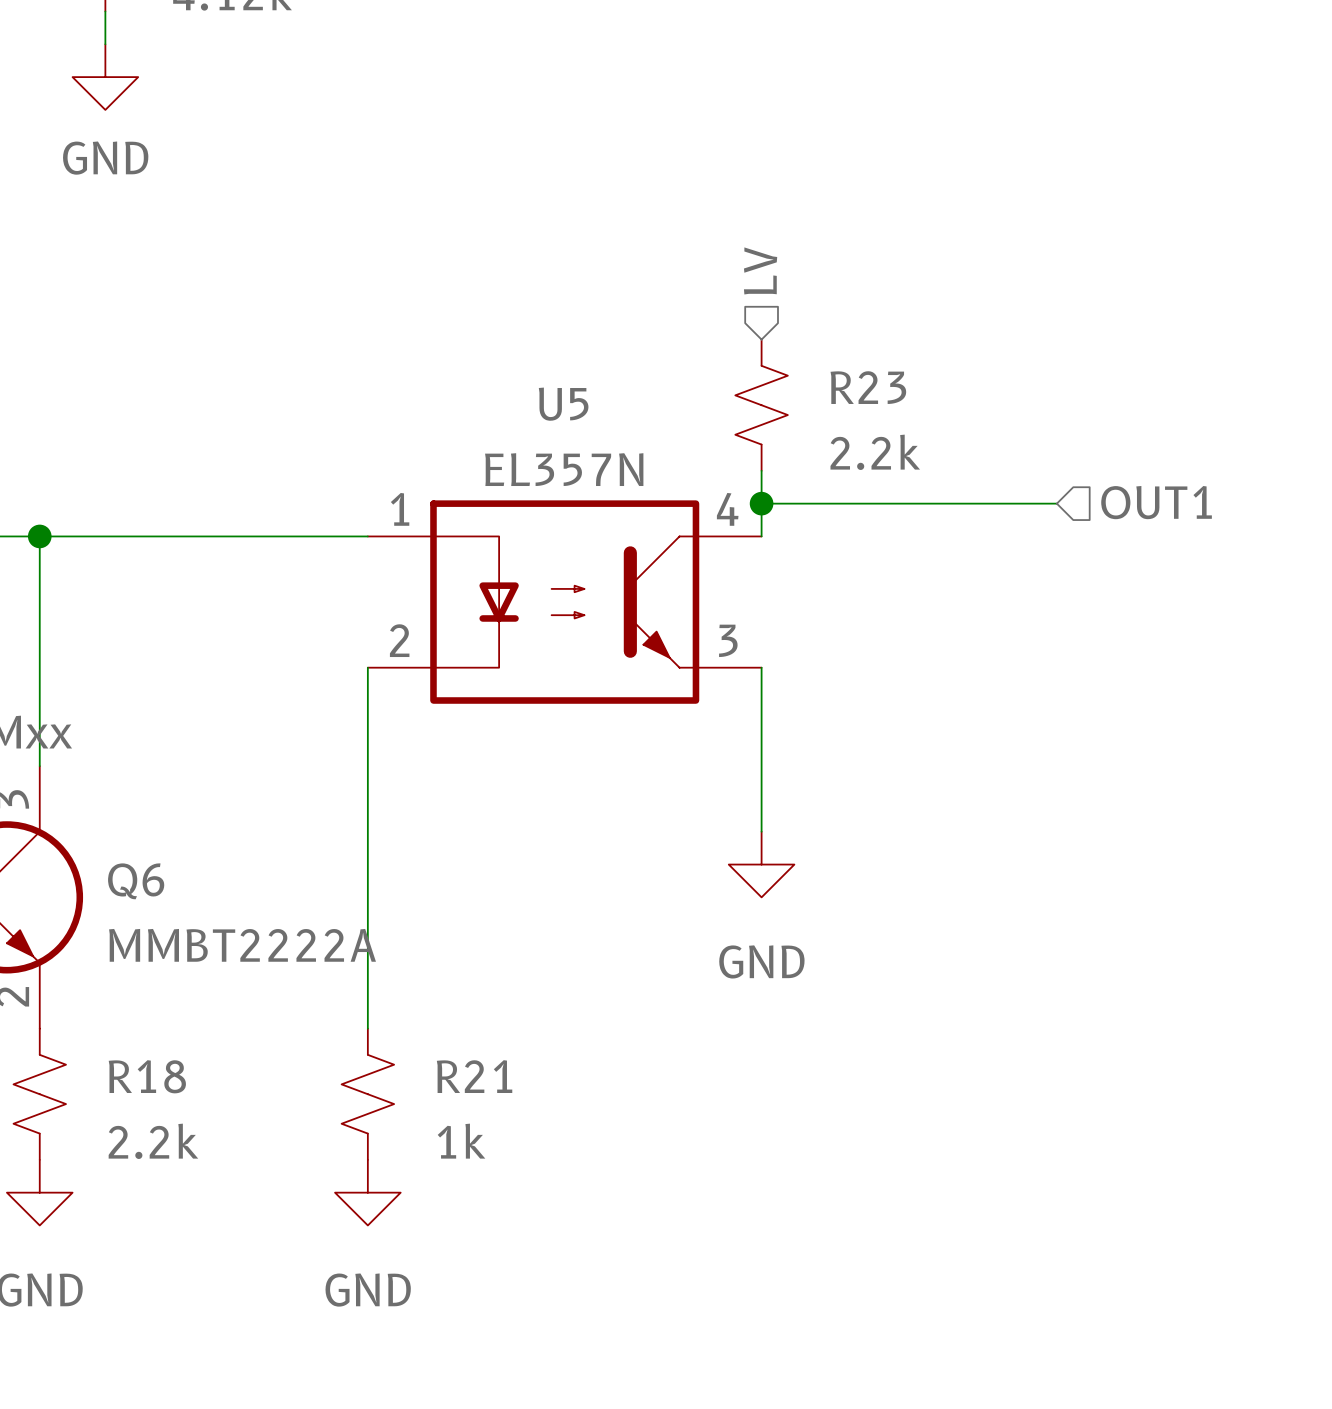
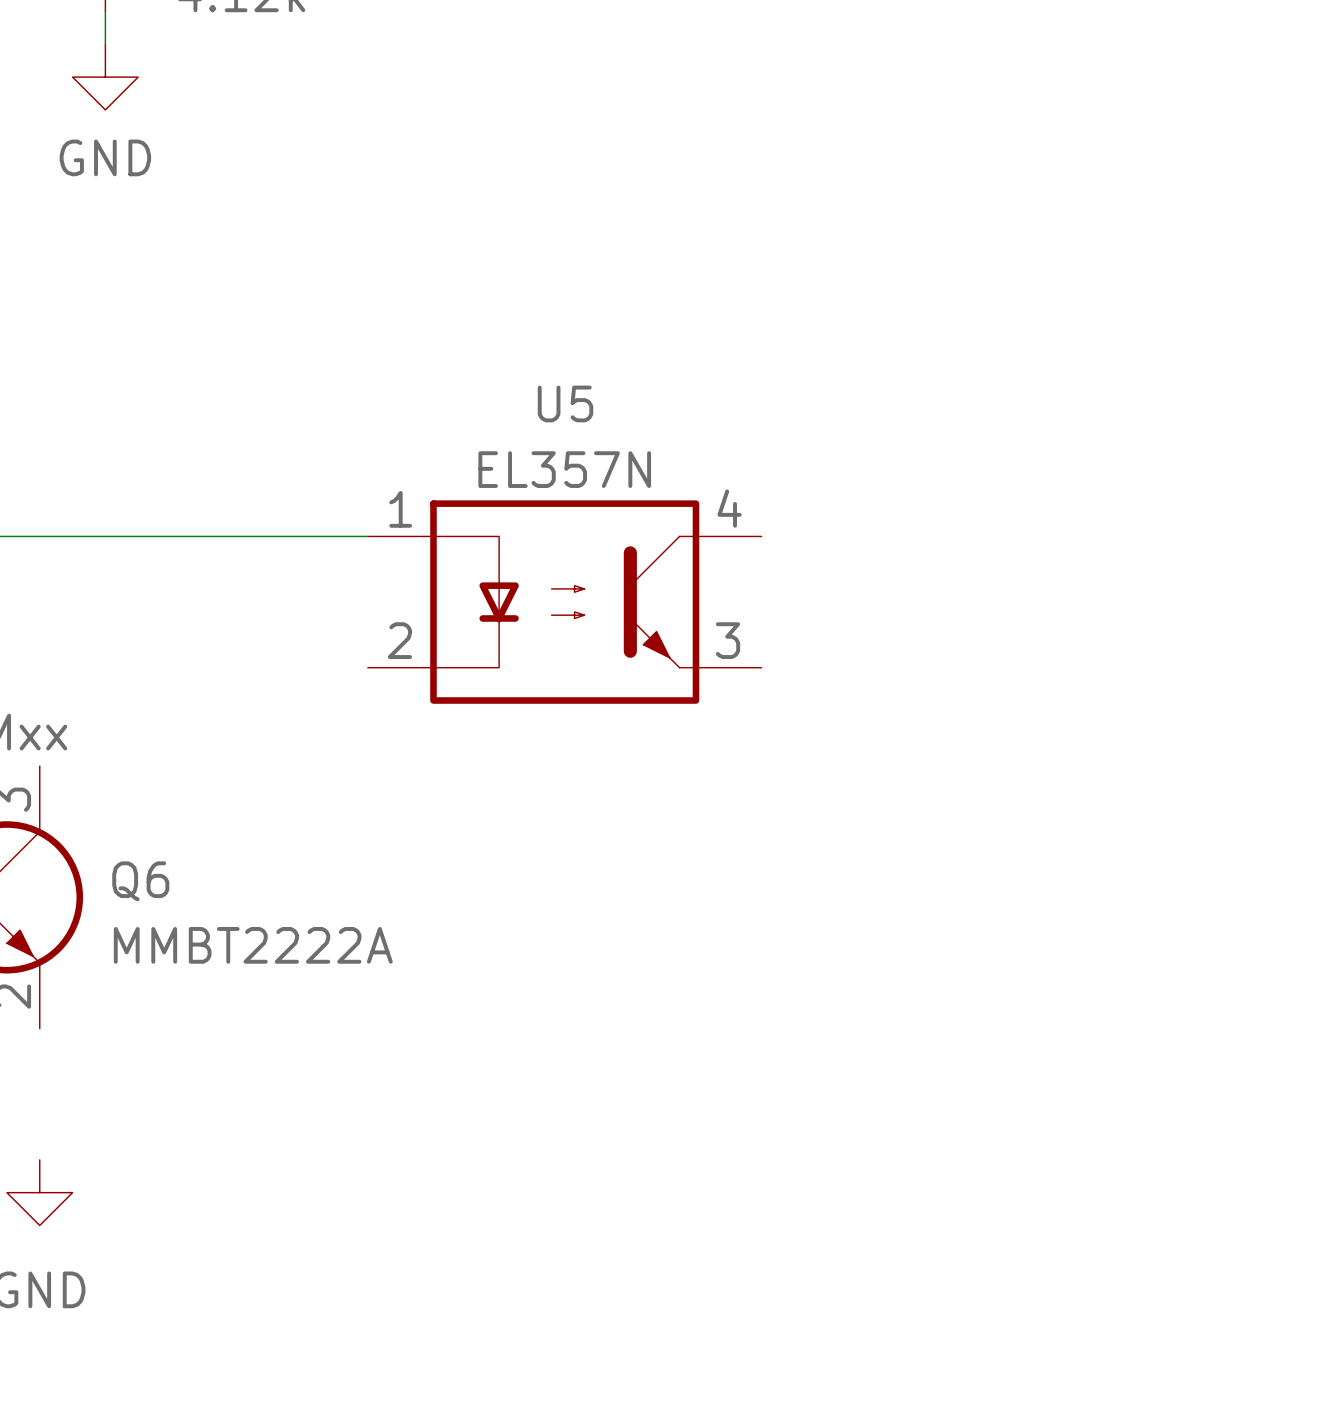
hierarchical label: LV (760, 270) -> none
R23: 2.2k (761, 405) -> none
wire: (761, 470) (761, 536) -> none
hierarchical label: OUT1 (1156, 502) -> none
wire: (761, 503) (1056, 503) -> none
junction: (761, 503) -> none
wire: (39, 536) (39, 766) -> none
junction: (39, 536) -> none
wire: (367, 667) (367, 1028) -> none
wire: (761, 667) (761, 831) -> none
power symbol: GND (761, 864) -> none
R18: 2.2k (39, 1094) -> none
R21: 1k (367, 1094) -> none
power symbol: GND (367, 1192) -> none

